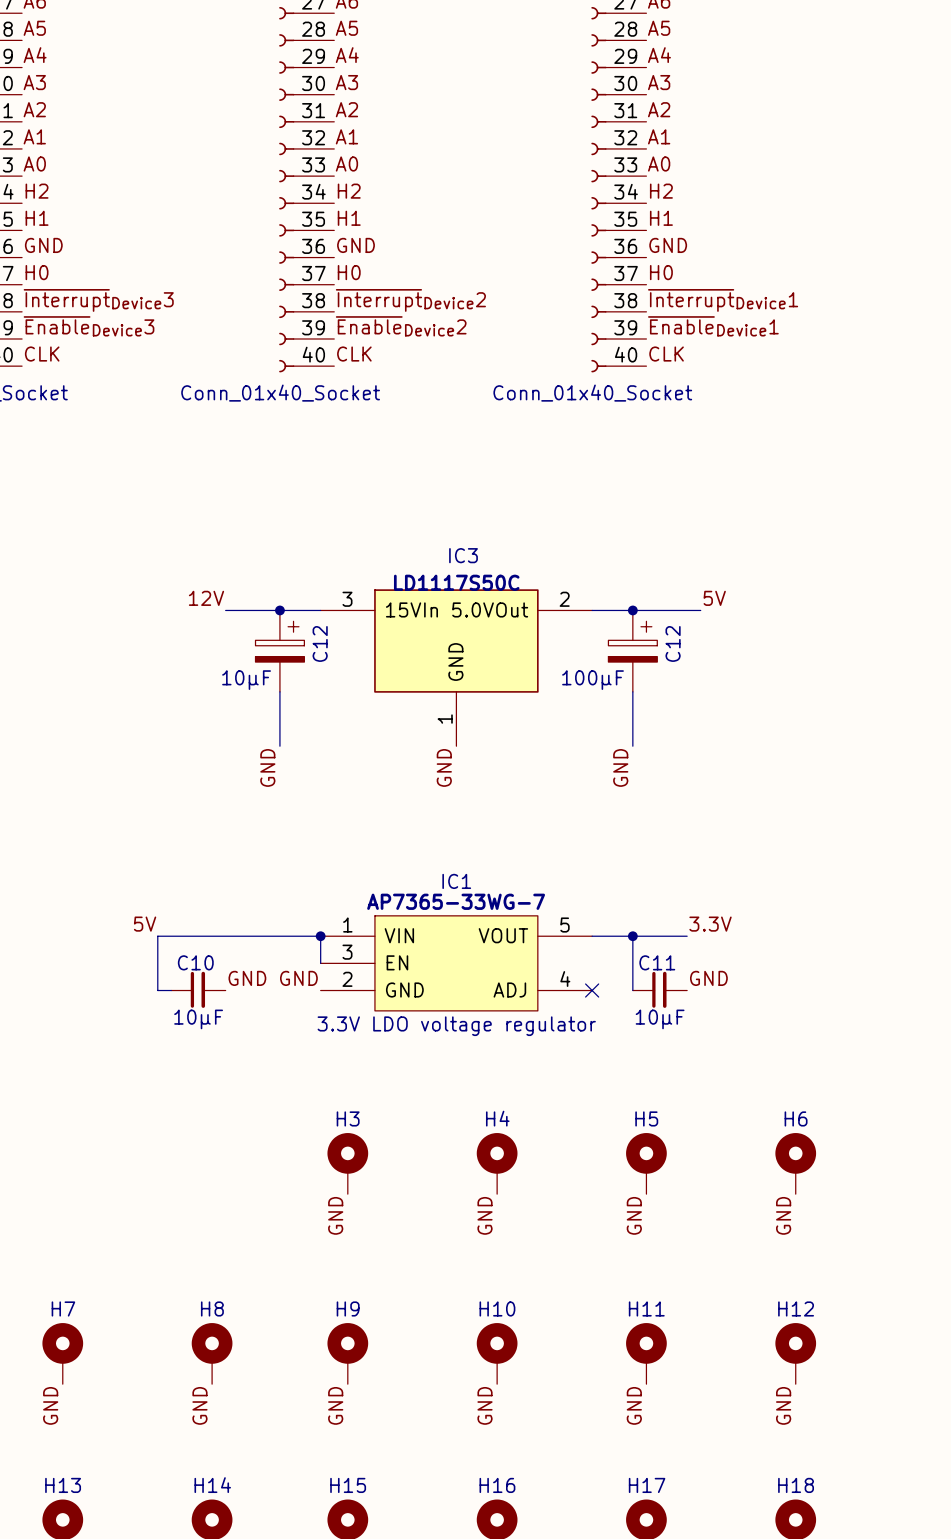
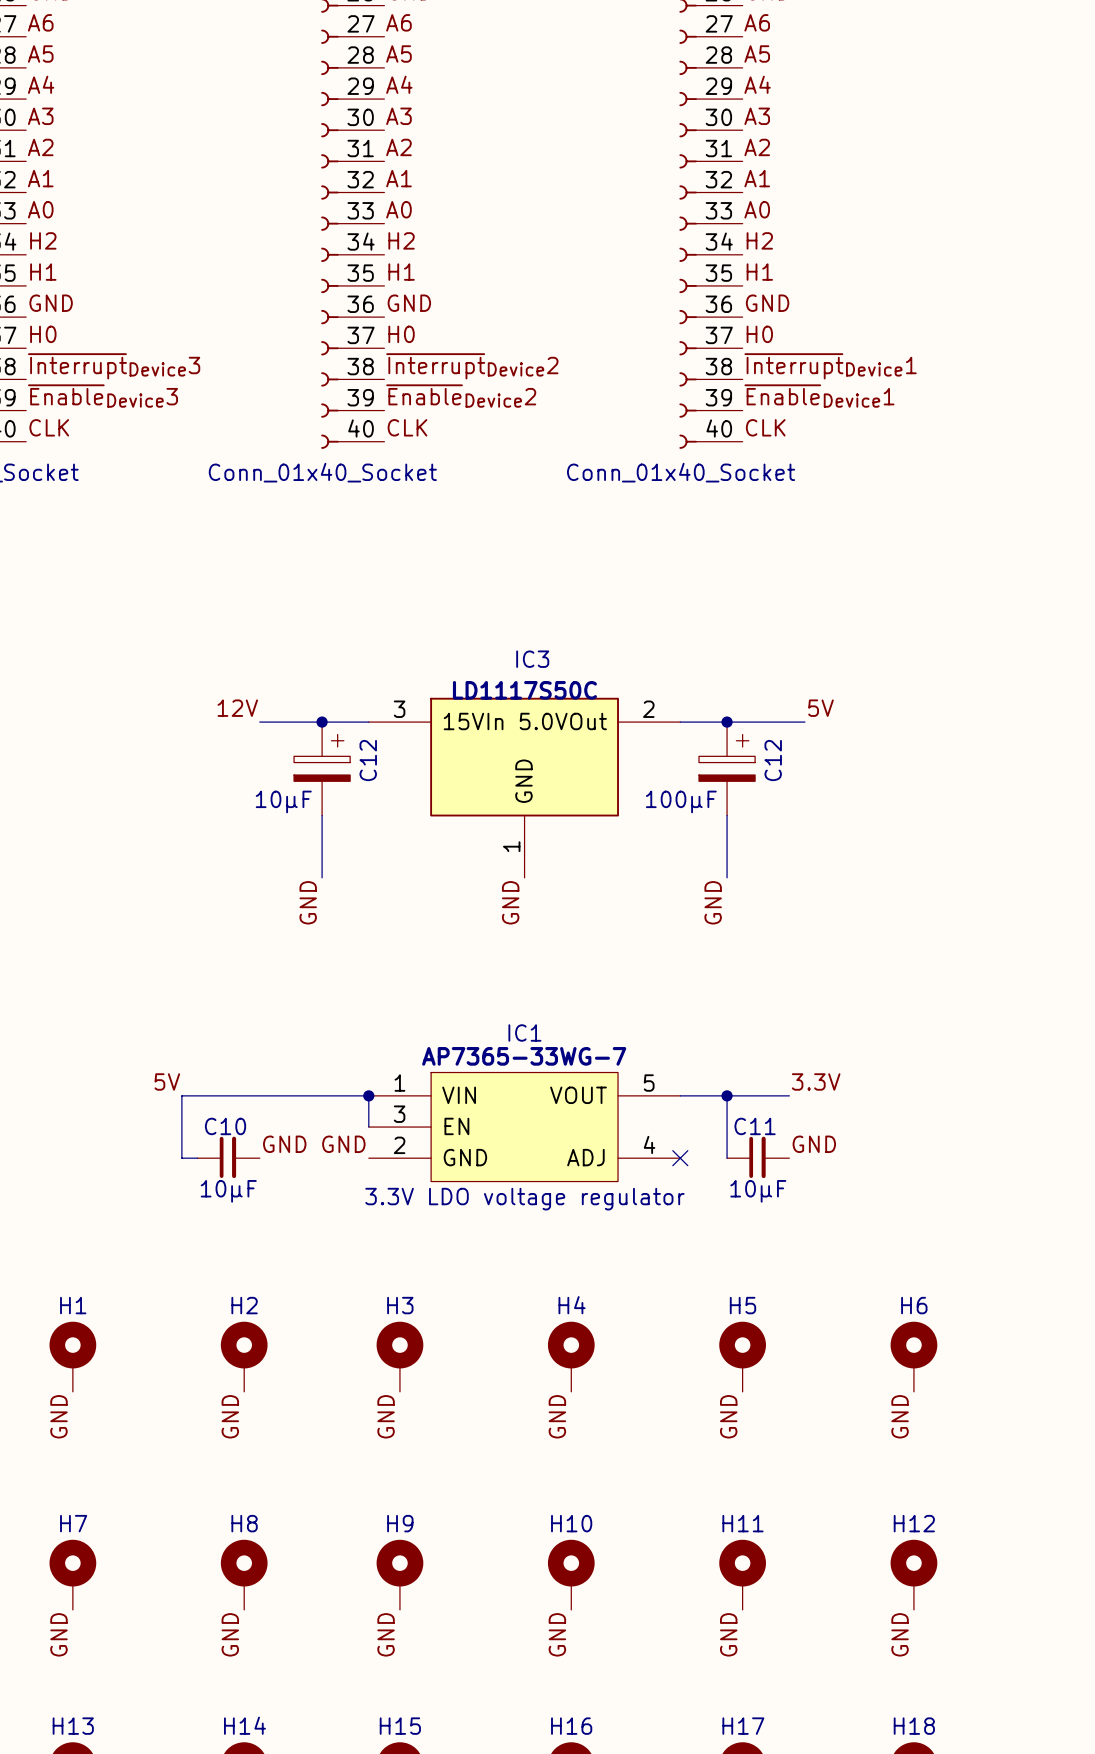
H1: none -> (72, 1356)
H2: none -> (244, 1356)
label: none -> GND (58, 1416)
label: none -> GND (230, 1416)

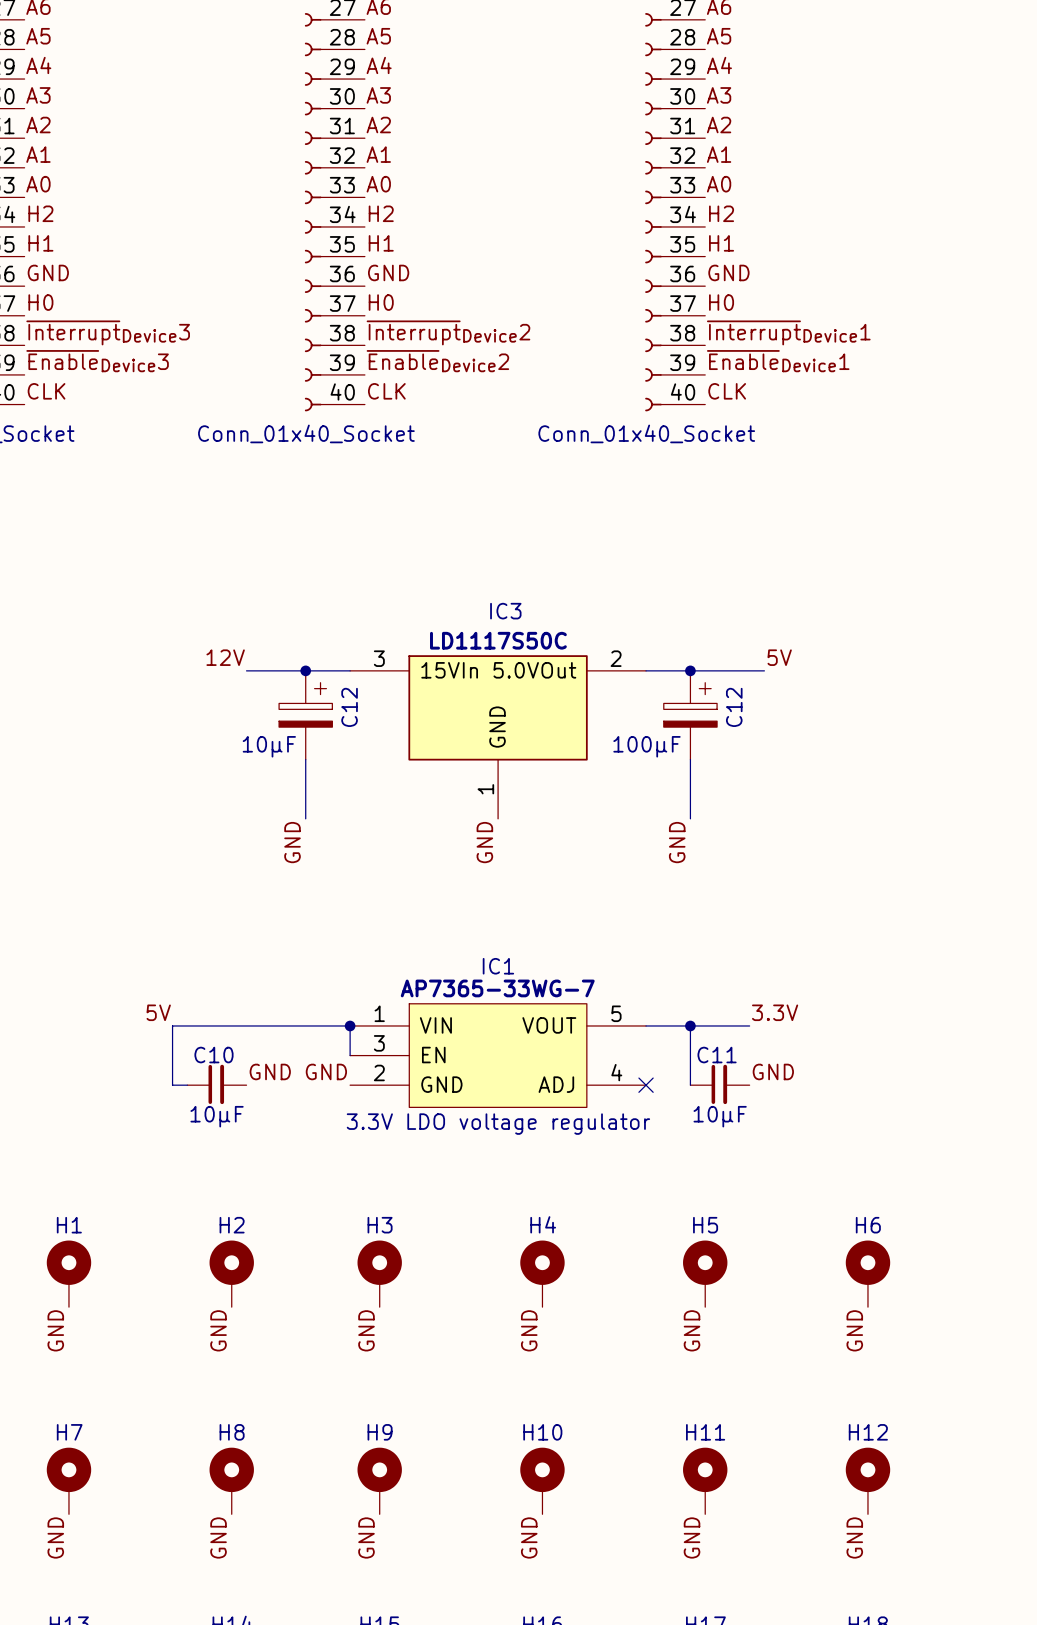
IC3 symbol: [368, 697, 681, 878] -> [350, 655, 647, 819]

